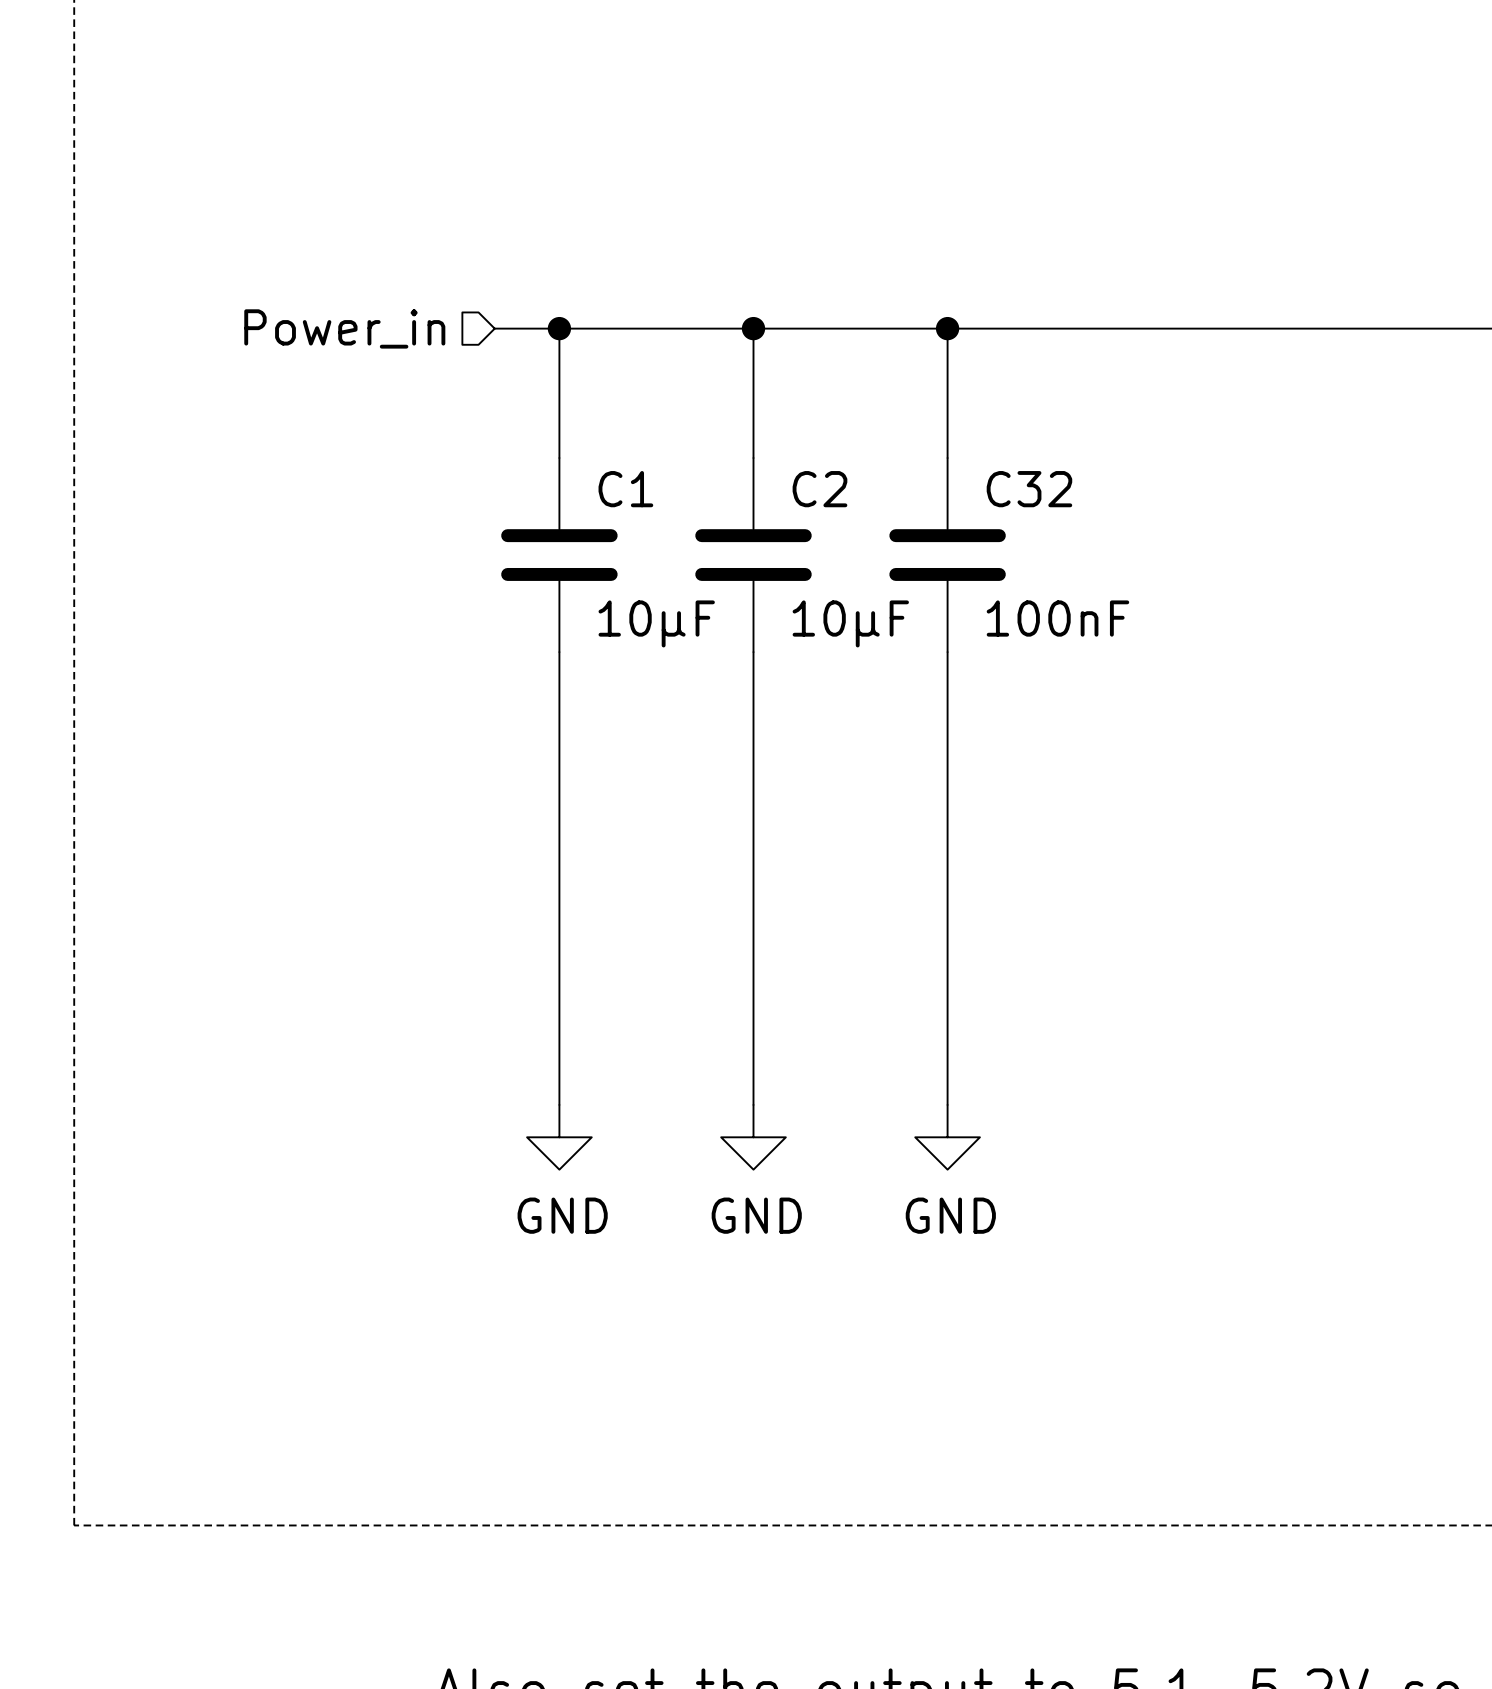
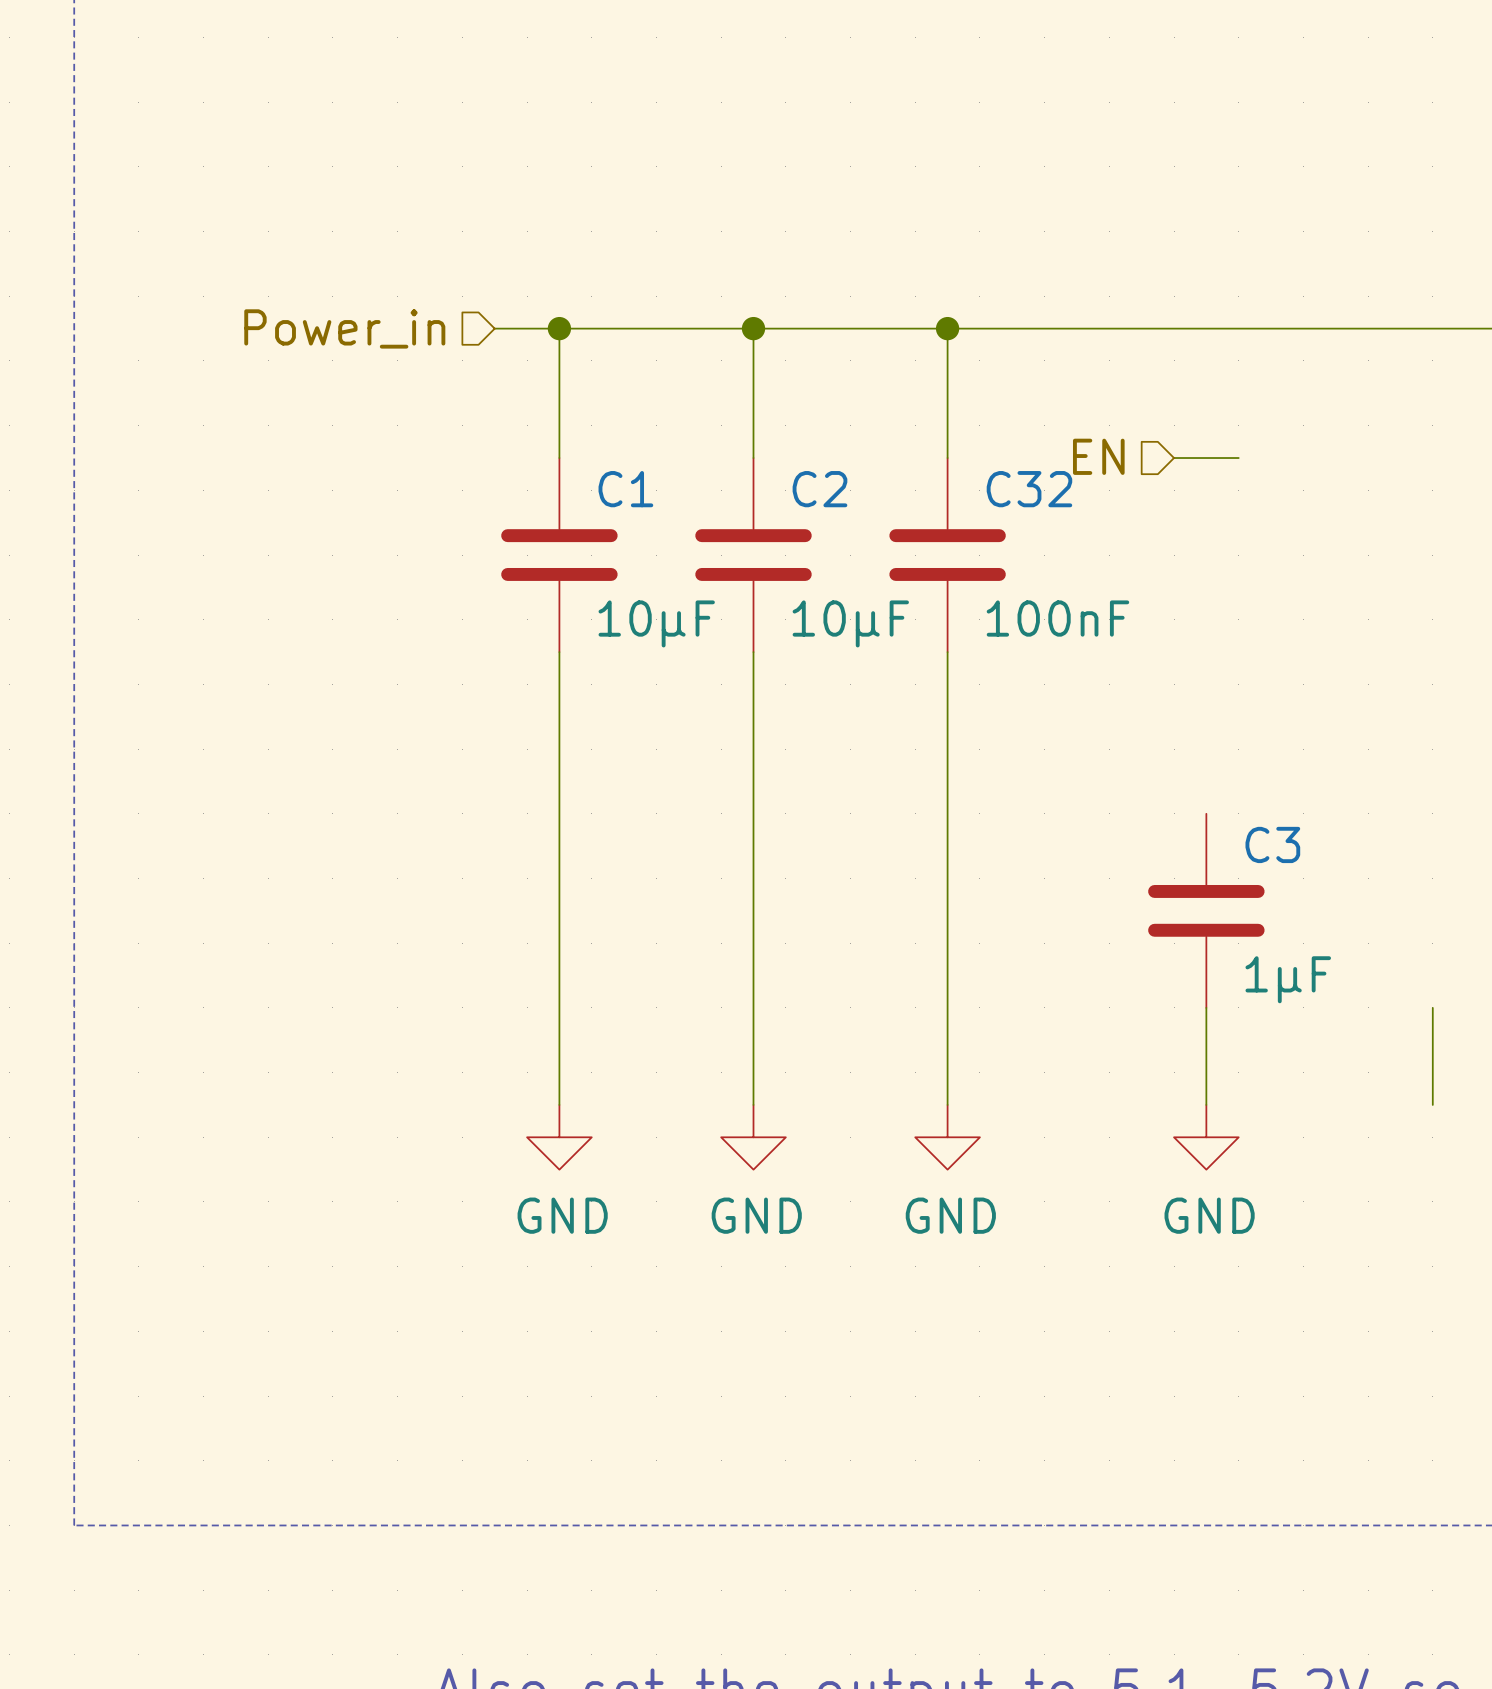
hierarchical label: none -> EN (1098, 456)
wire: none -> (1174, 458) (1238, 458)
C3: none -> 1µF (1206, 910)
wire: none -> (1206, 1007) (1206, 1104)
wire: none -> (1432, 1007) (1432, 1104)
power symbol: none -> GND (1206, 1137)

